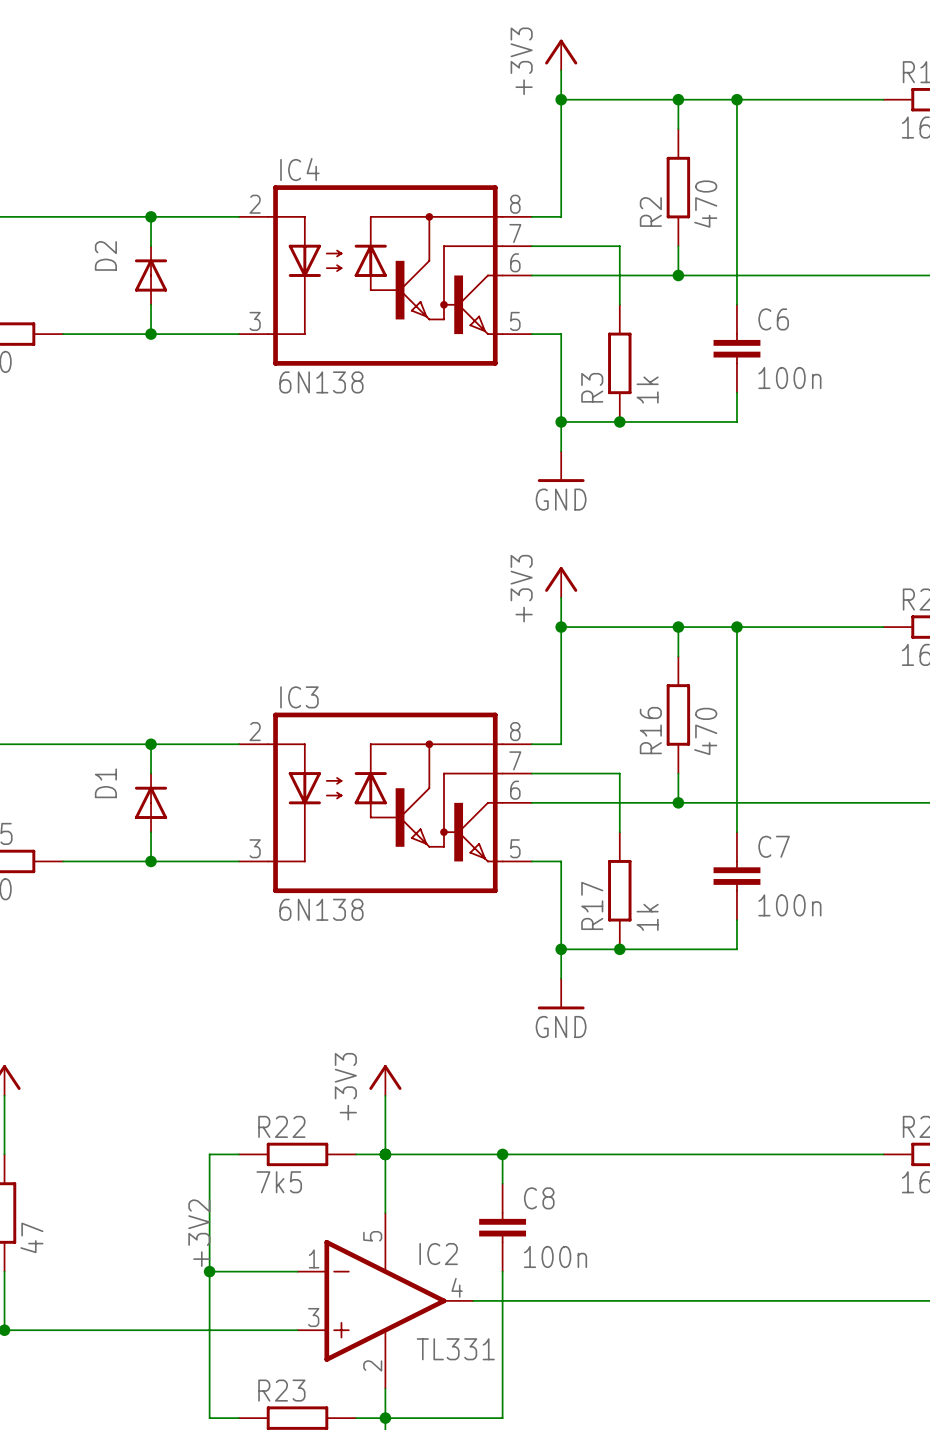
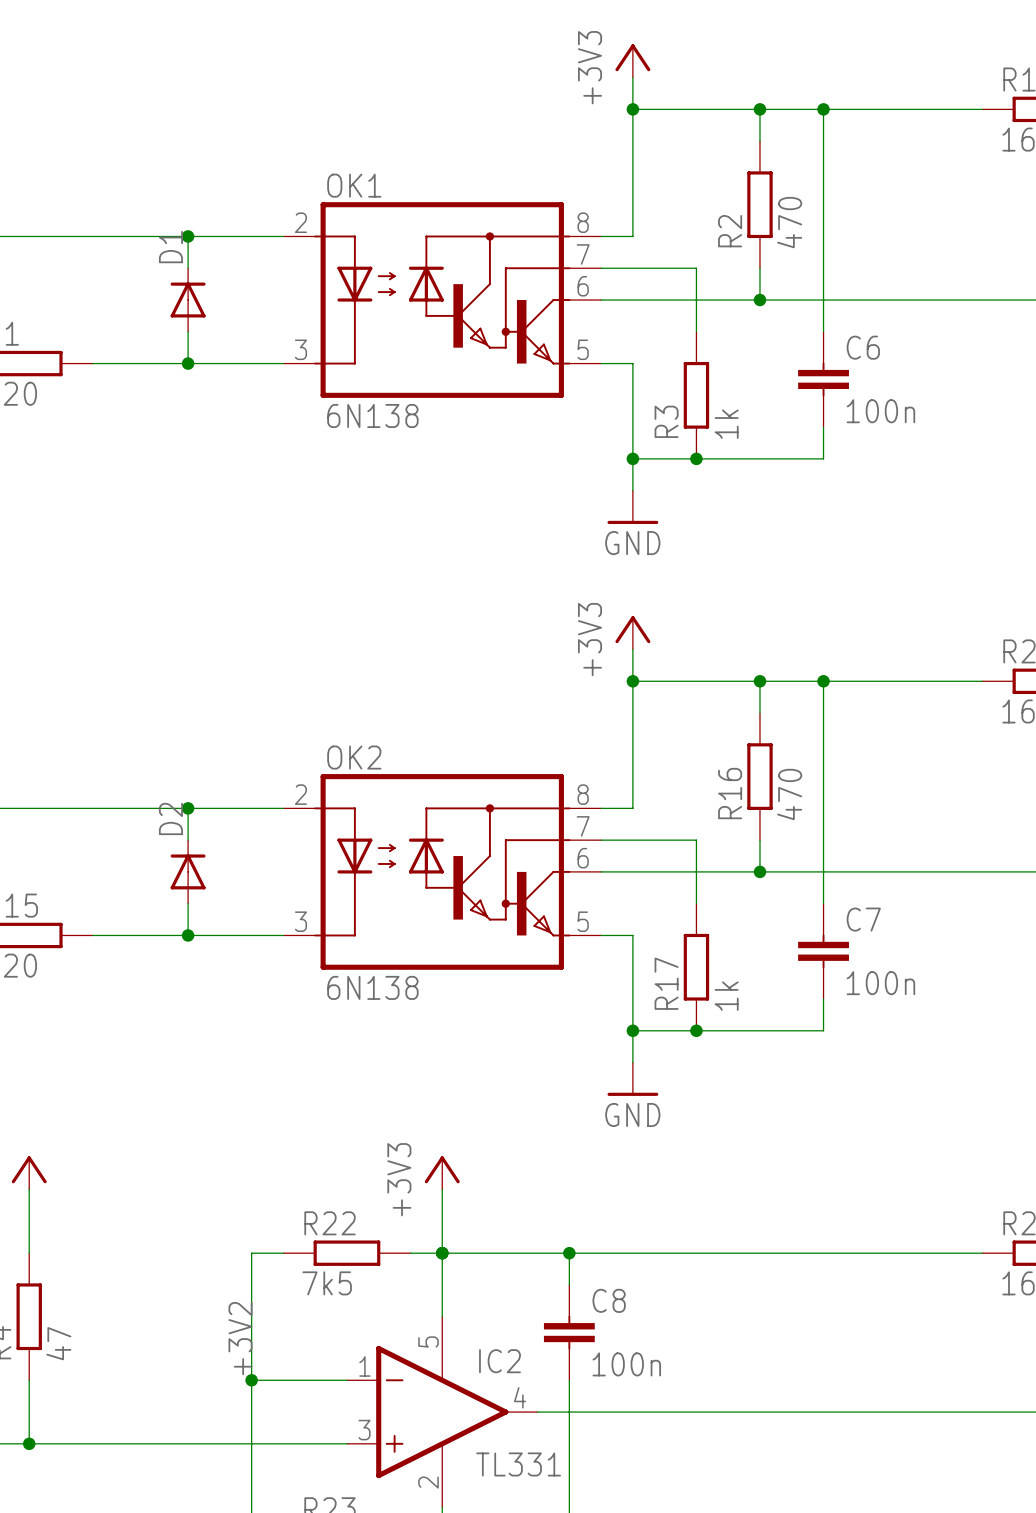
IC4 name: IC4 (299, 169) -> OK1 (354, 185)
D2 name: D2 (105, 255) -> D1 (170, 247)
IC3 name: IC3 (299, 697) -> OK2 (354, 757)
D1 name: D1 (105, 783) -> D2 (170, 818)

